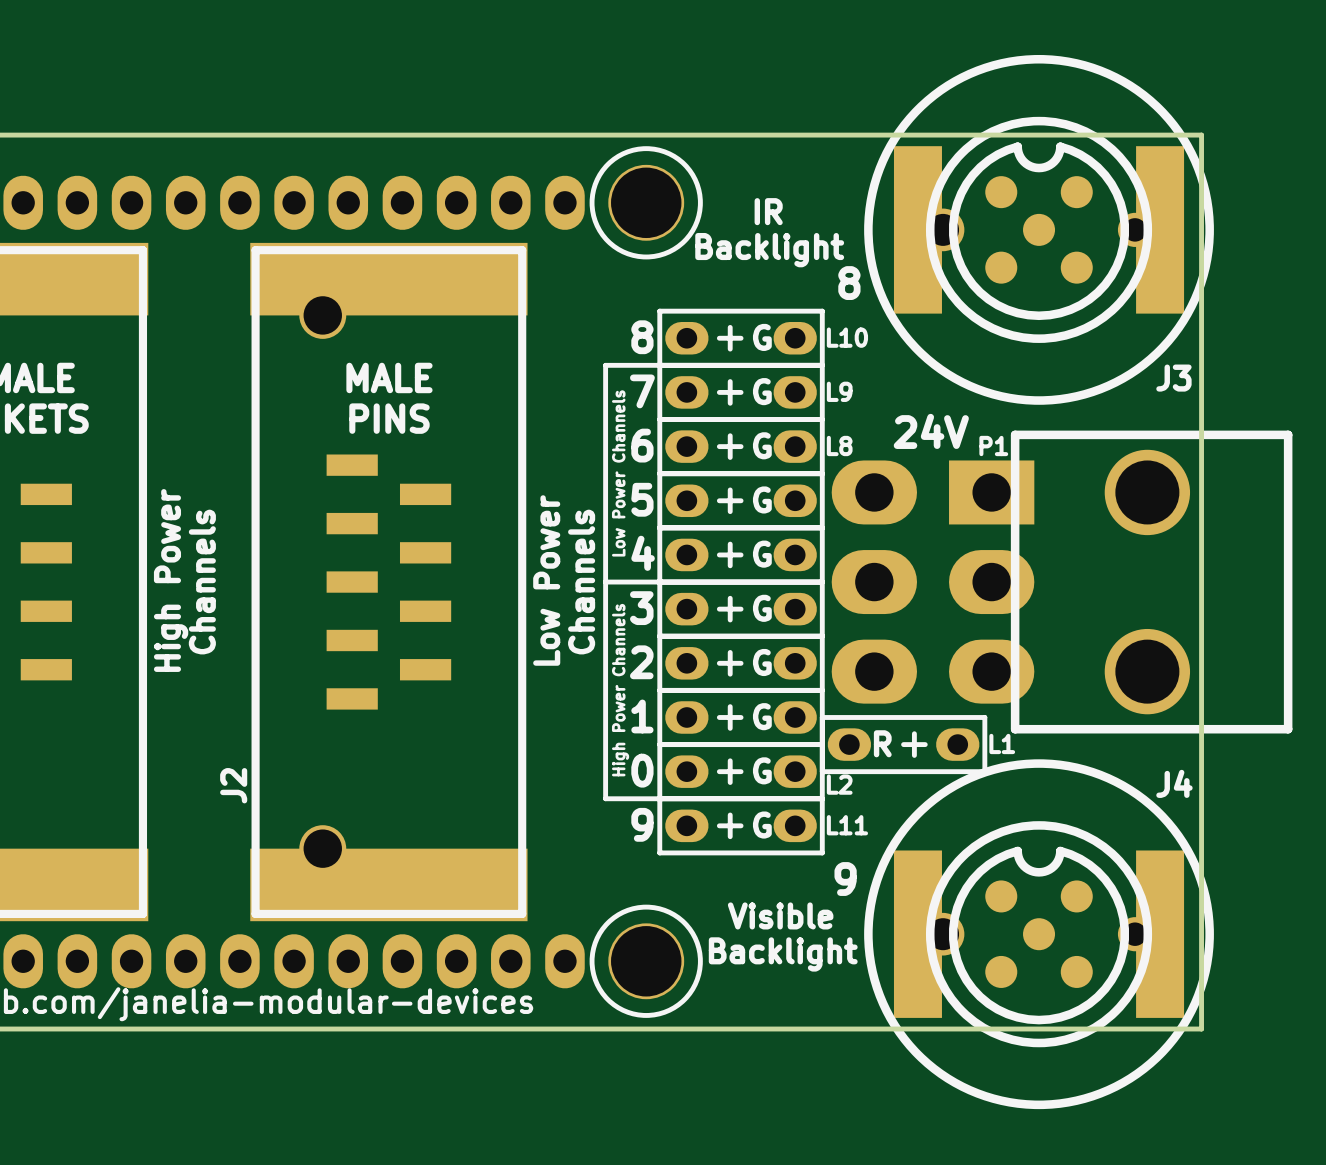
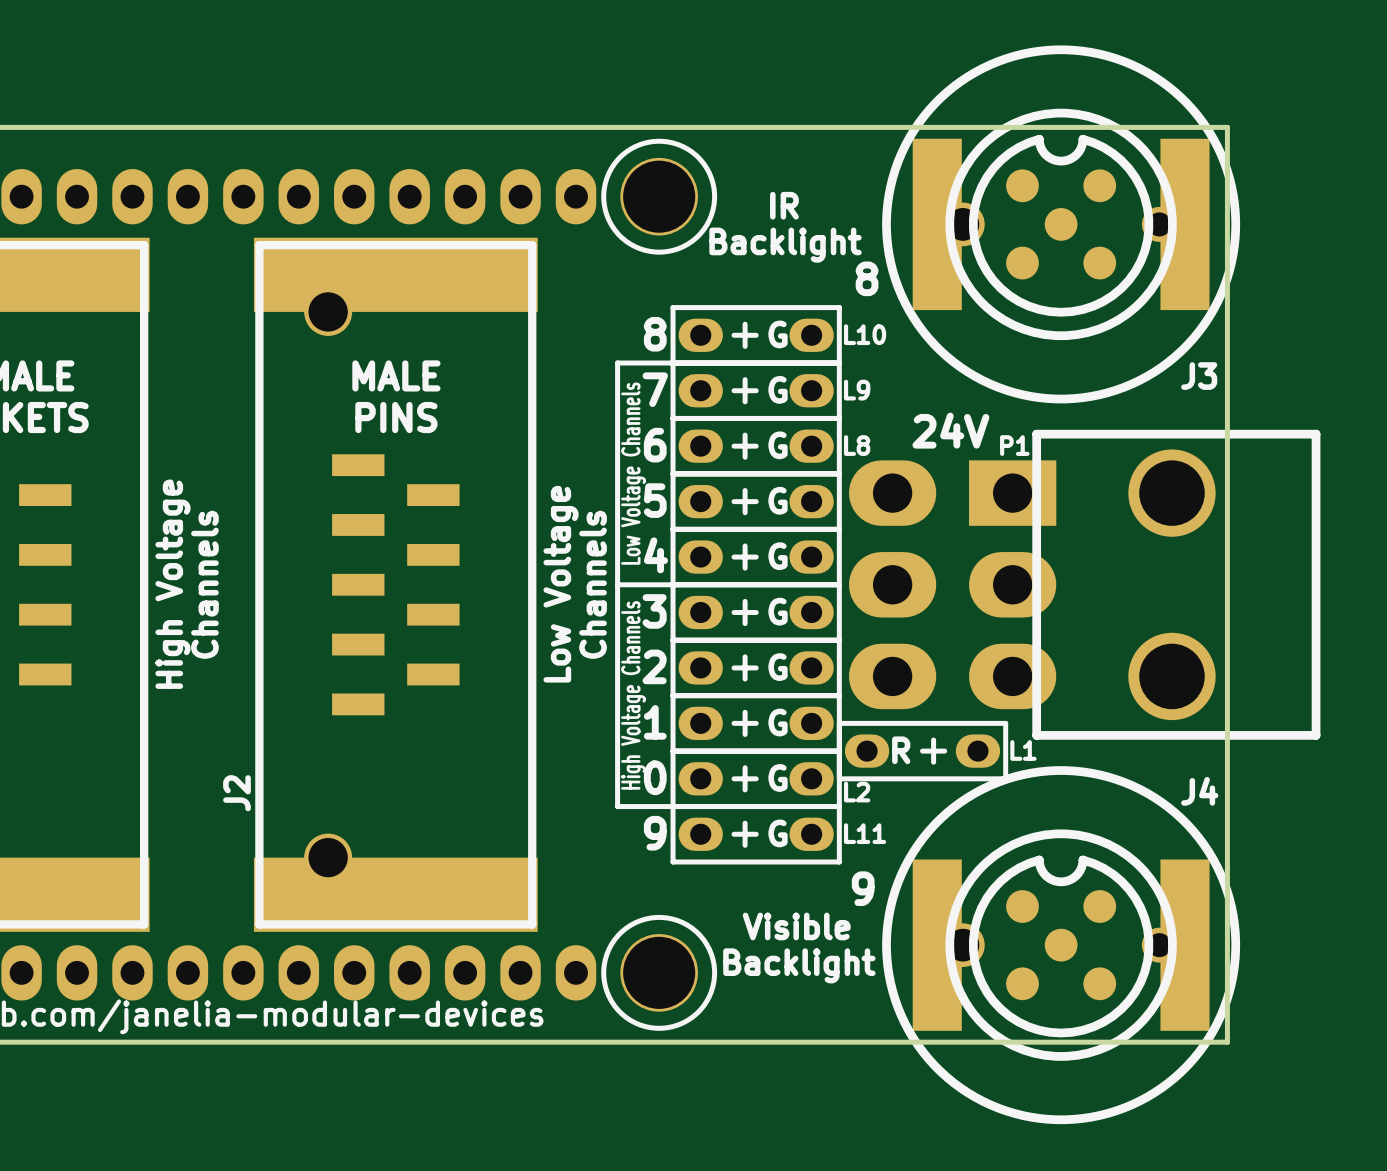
text: Low Power Channels (618, 473) -> Low Voltage Channels (633, 473)
text: High Power (171, 580) -> High Voltage (172, 584)
text: Low Power (546, 580) -> Low Voltage (561, 584)
text: High Power Channels (620, 690) -> High Voltage Channels (633, 695)

